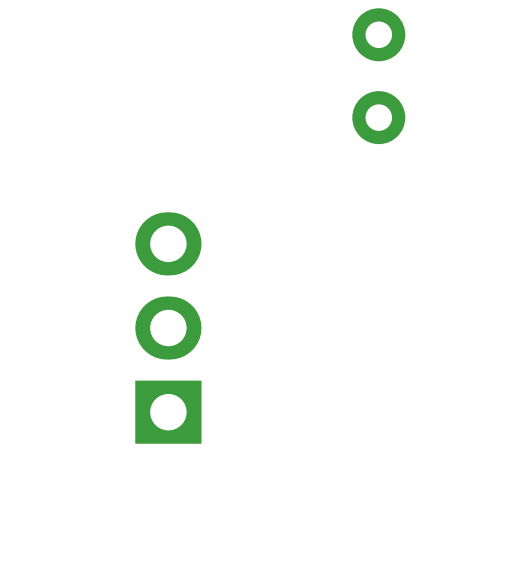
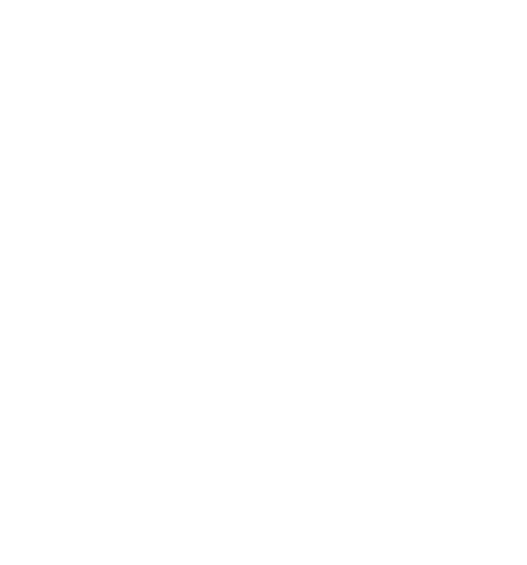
part: (378, 76) -> none
part: (168, 328) -> none

